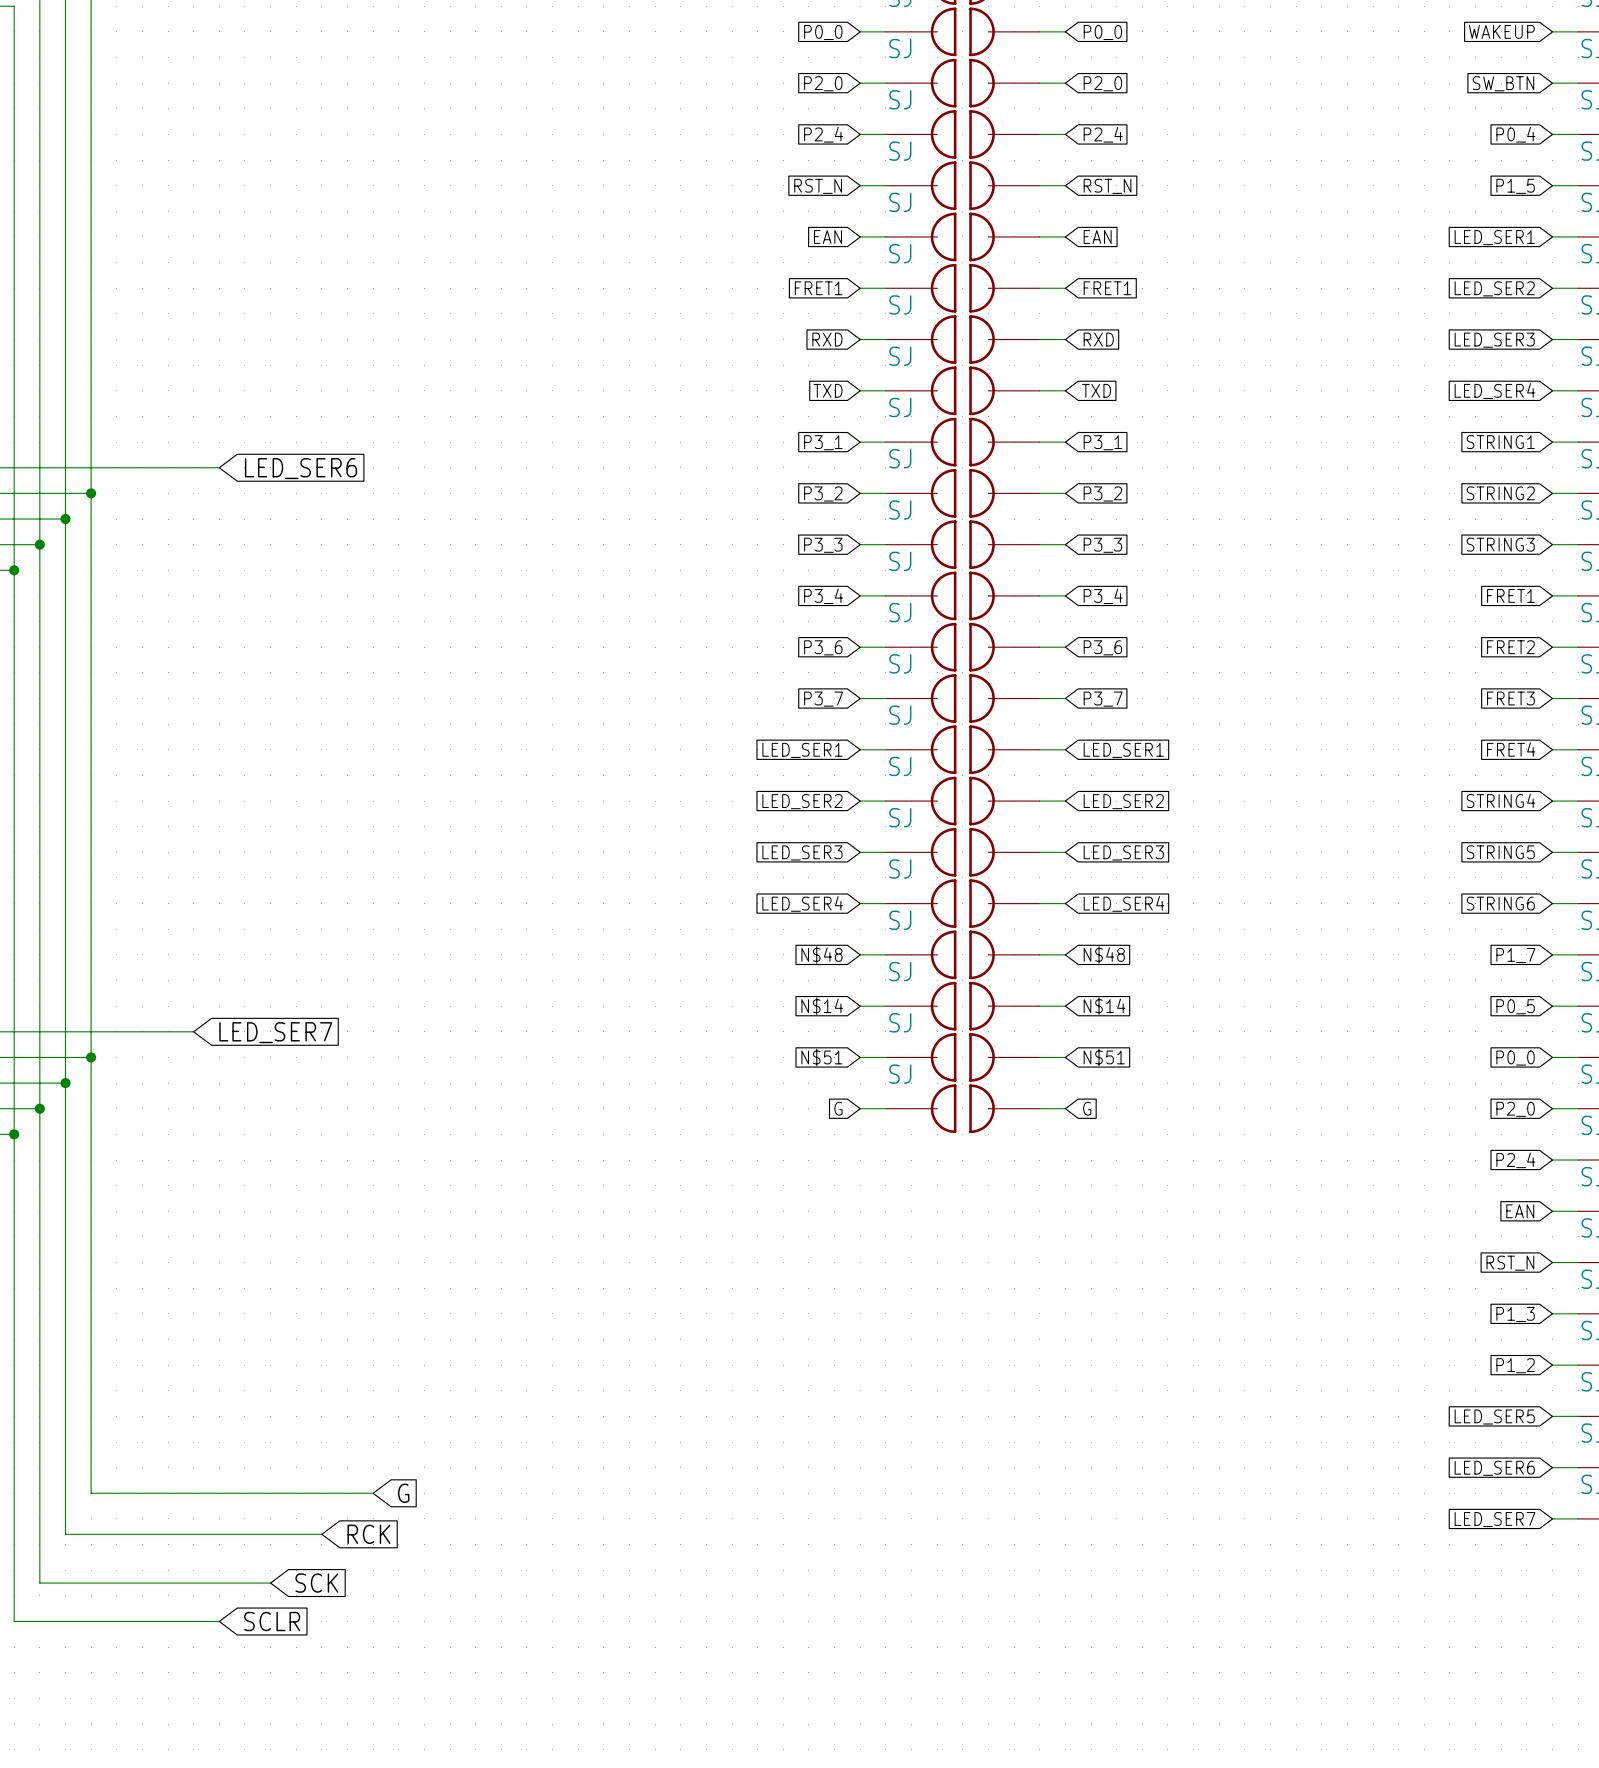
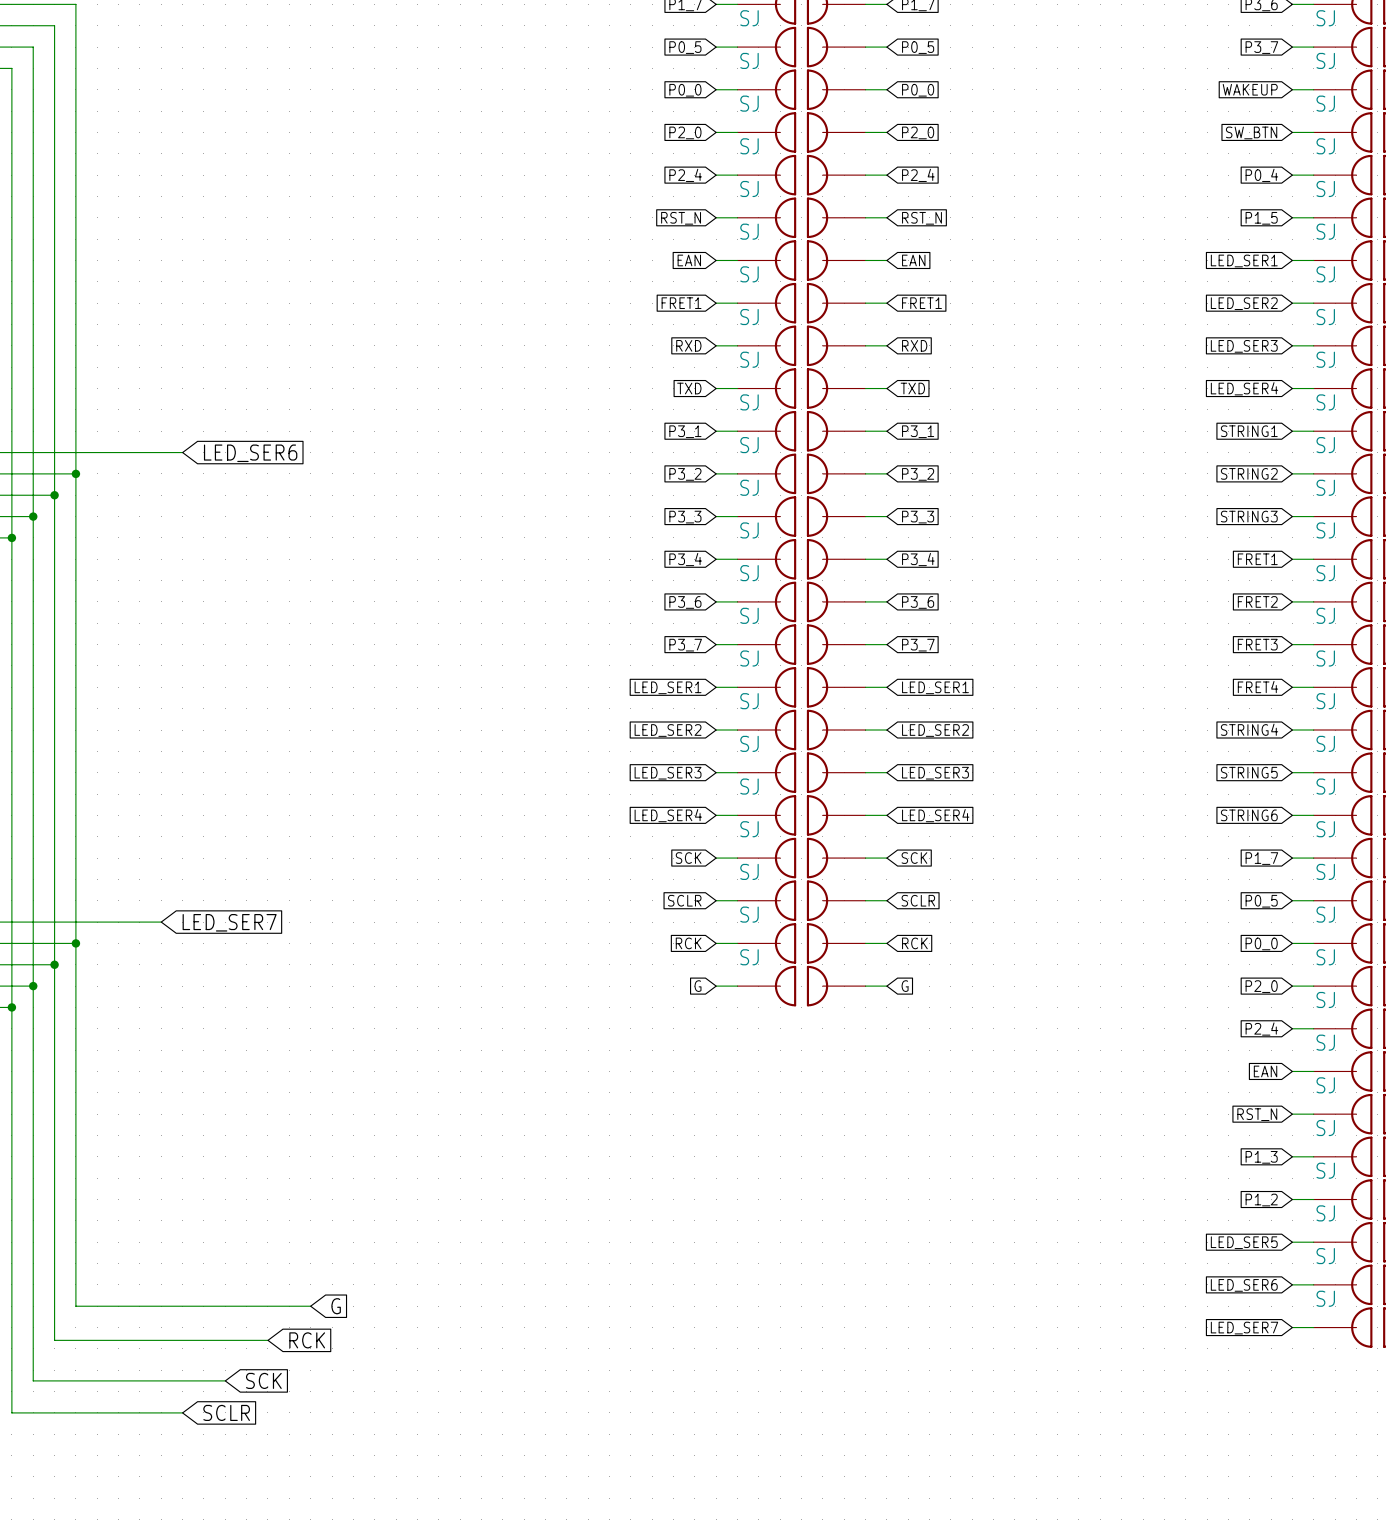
global label: N$48 (821, 954) -> SCK (688, 858)
global label: N$48 (1104, 954) -> SCK (914, 858)
global label: N$14 (822, 1006) -> SCLR (684, 900)
global label: N$14 (1104, 1006) -> SCLR (918, 900)
global label: N$51 (821, 1057) -> RCK (688, 943)
global label: N$51 (1104, 1057) -> RCK (914, 943)

